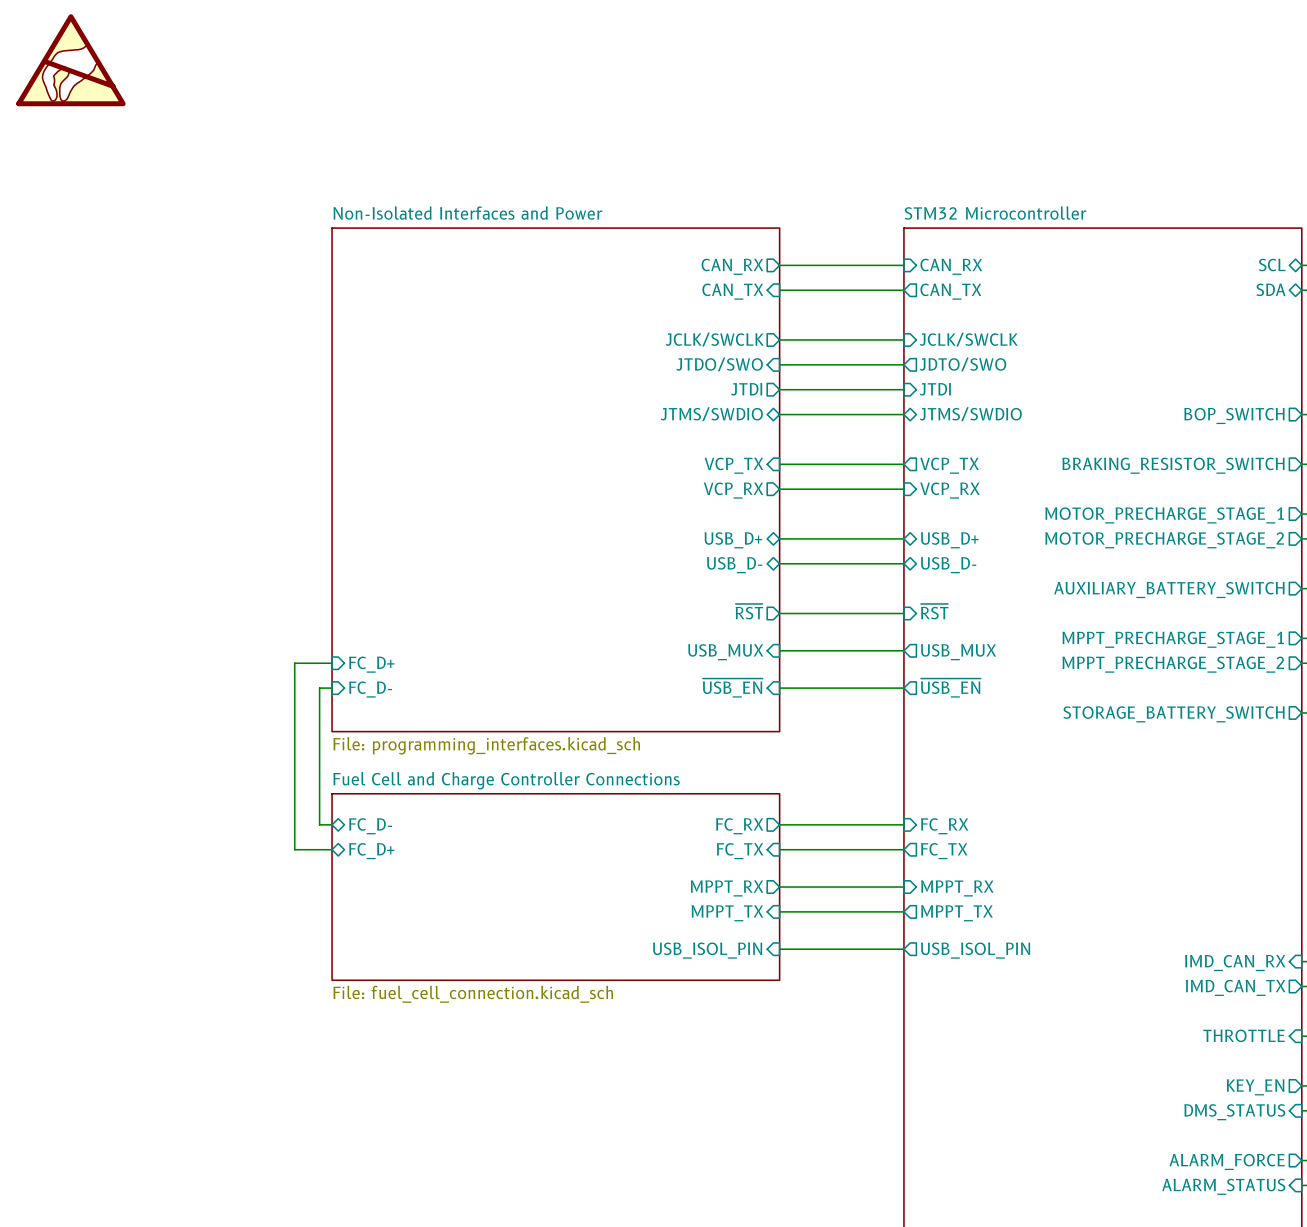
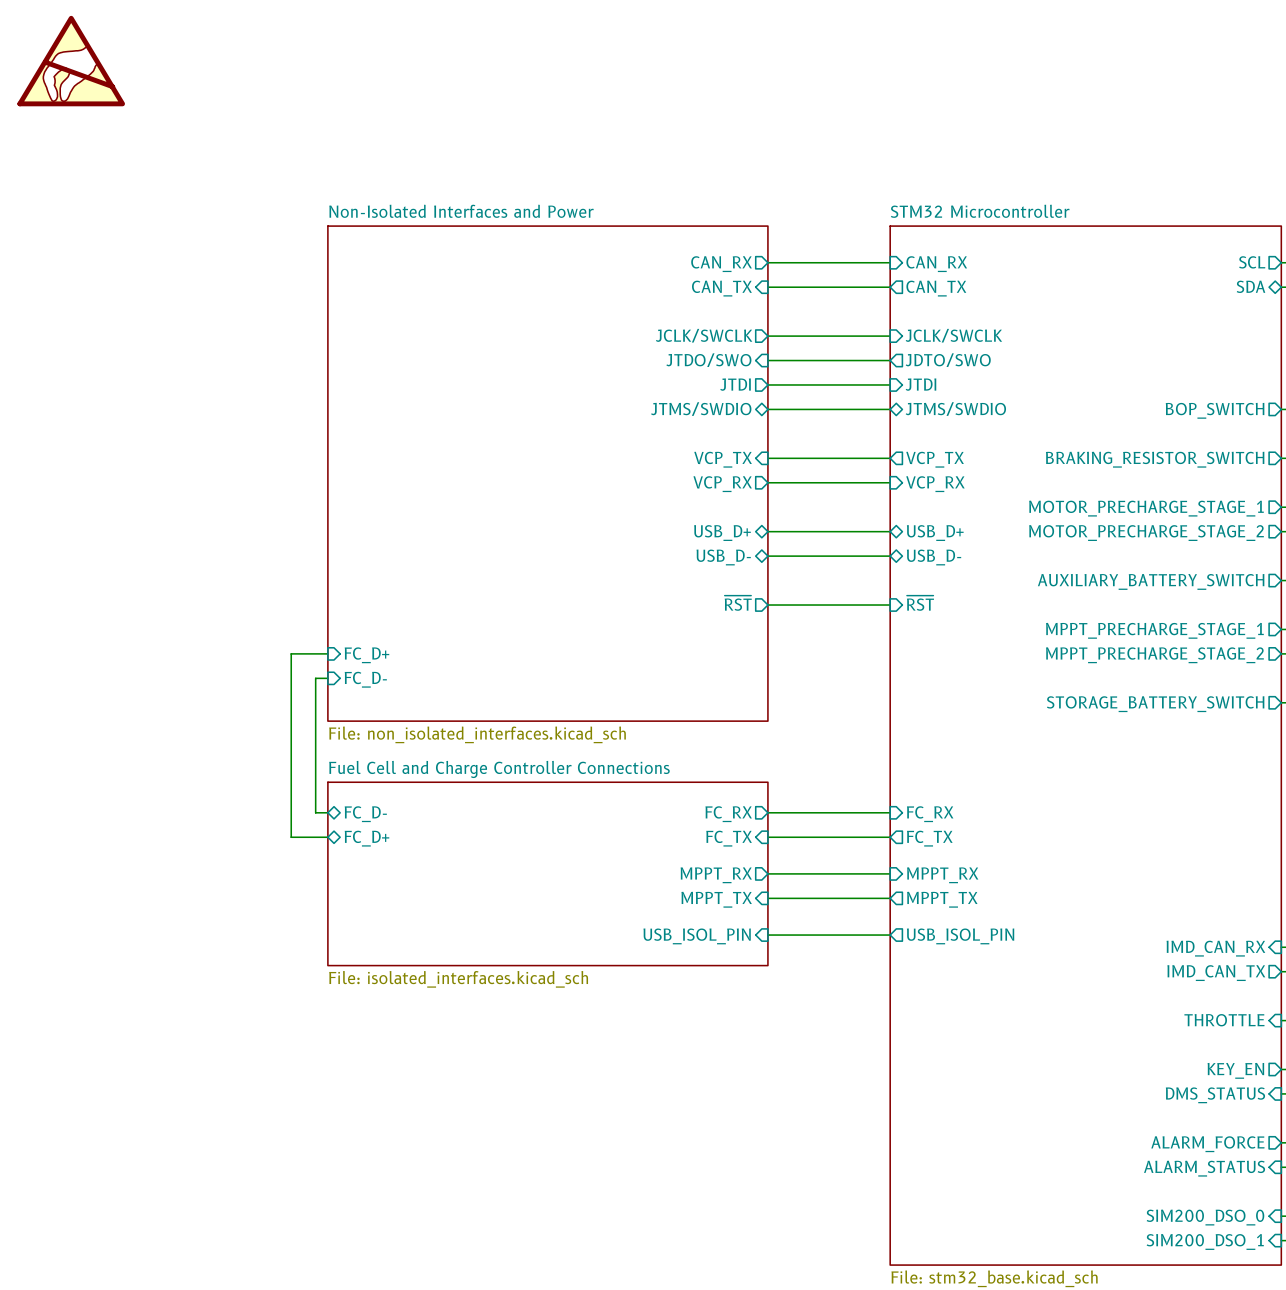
sheet pin shape: bidirectional (1272, 264) -> output (1252, 262)
wire: (779, 650) (903, 650) -> none
sheet pin: USB_MUX (725, 652) -> none
sheet pin: USB_MUX (958, 652) -> none
sheet pin: ~{USB_EN} (732, 688) -> none
wire: (779, 688) (903, 688) -> none
sheet pin: ~{USB_EN} (950, 688) -> none
sheet Non-Isolated Interfaces and Power value: File: programming_interfaces.kicad_sch (486, 745) -> File: non_isolated_interfaces.kicad_sch (477, 734)
sheet Fuel Cell and Charge Controller Connections value: File: fuel_cell_connection.kicad_sch (473, 994) -> File: isolated_interfaces.kicad_sch (458, 979)

